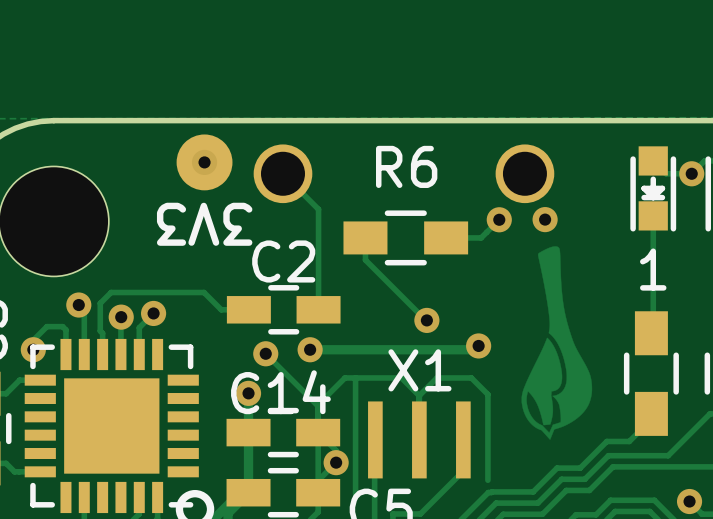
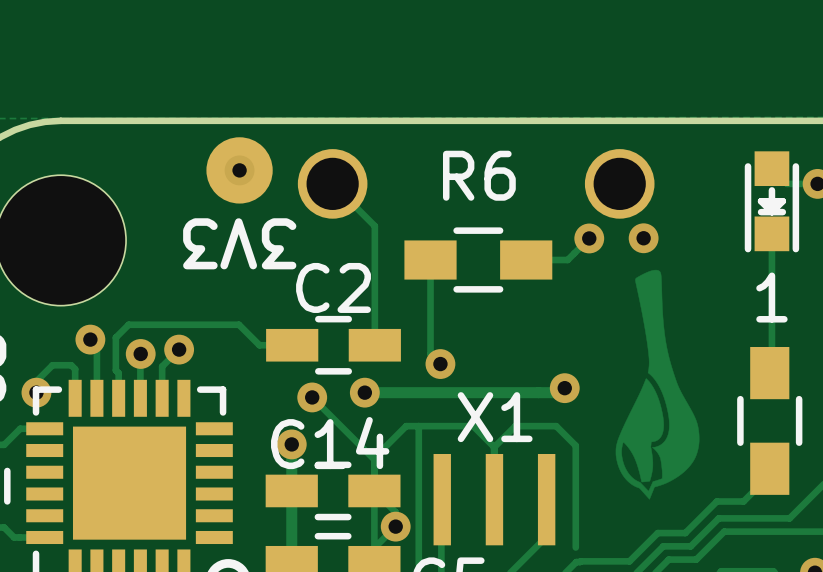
track: (365, 260) (426, 320) -> (430, 286) (430, 354) (440, 364)
via position: (426, 320) -> (440, 364)

